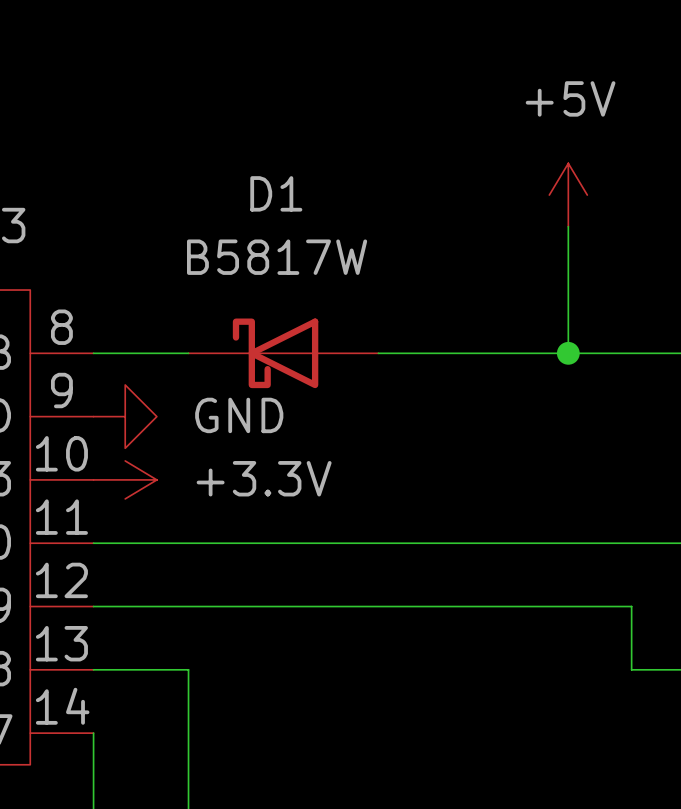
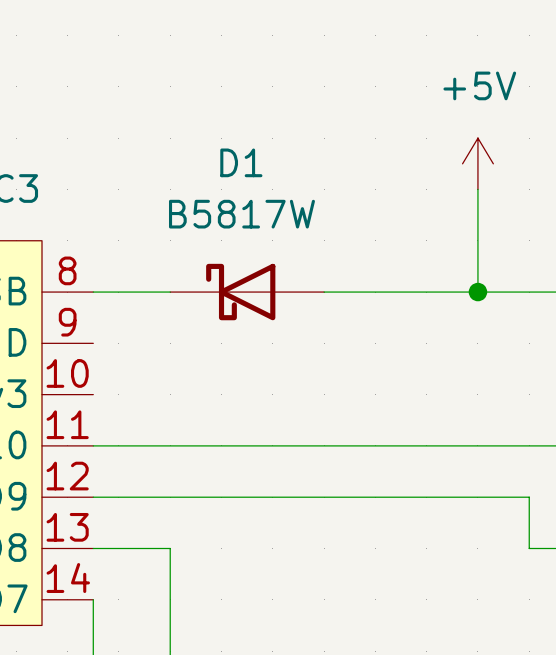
power symbol: GND (125, 416) -> none
power symbol: +3.3V (125, 479) -> none

